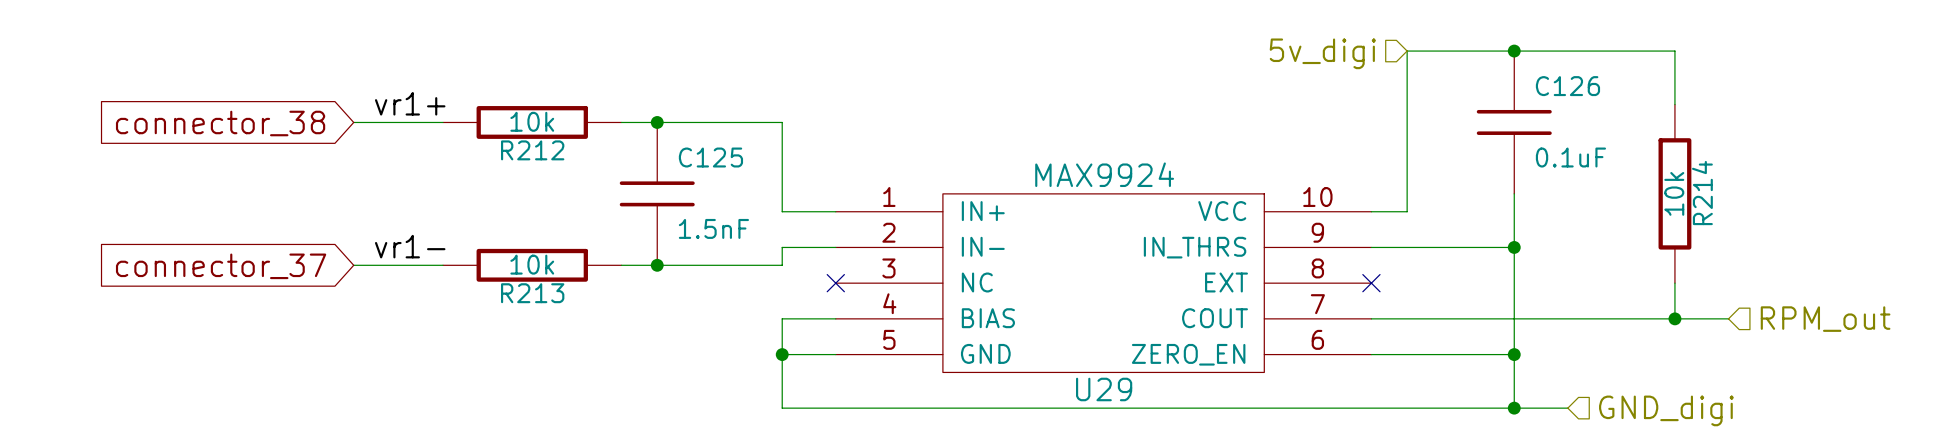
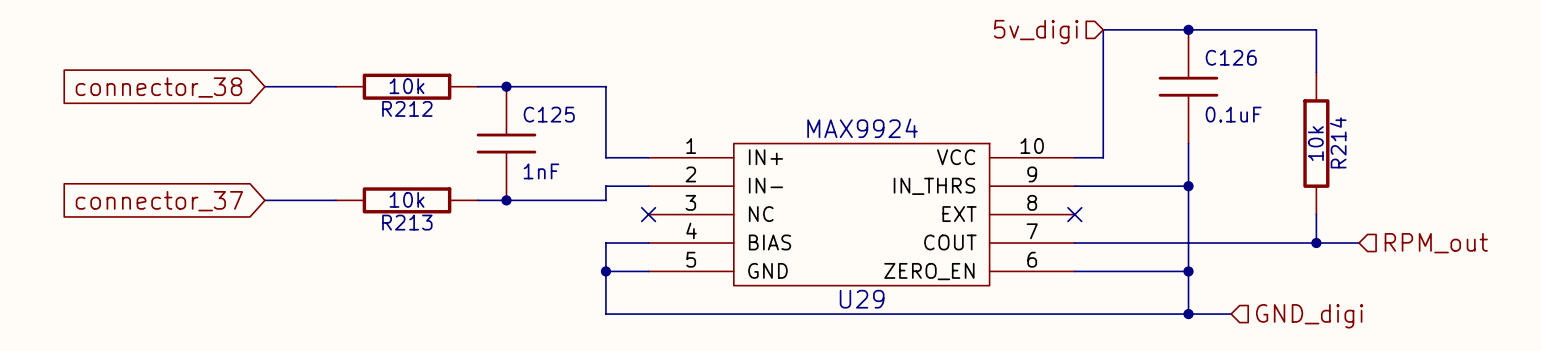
label: vr1+ (410, 103) -> none
C125 value: 1.5nF (713, 228) -> 1nF (541, 171)
label: vr1- (410, 246) -> none

